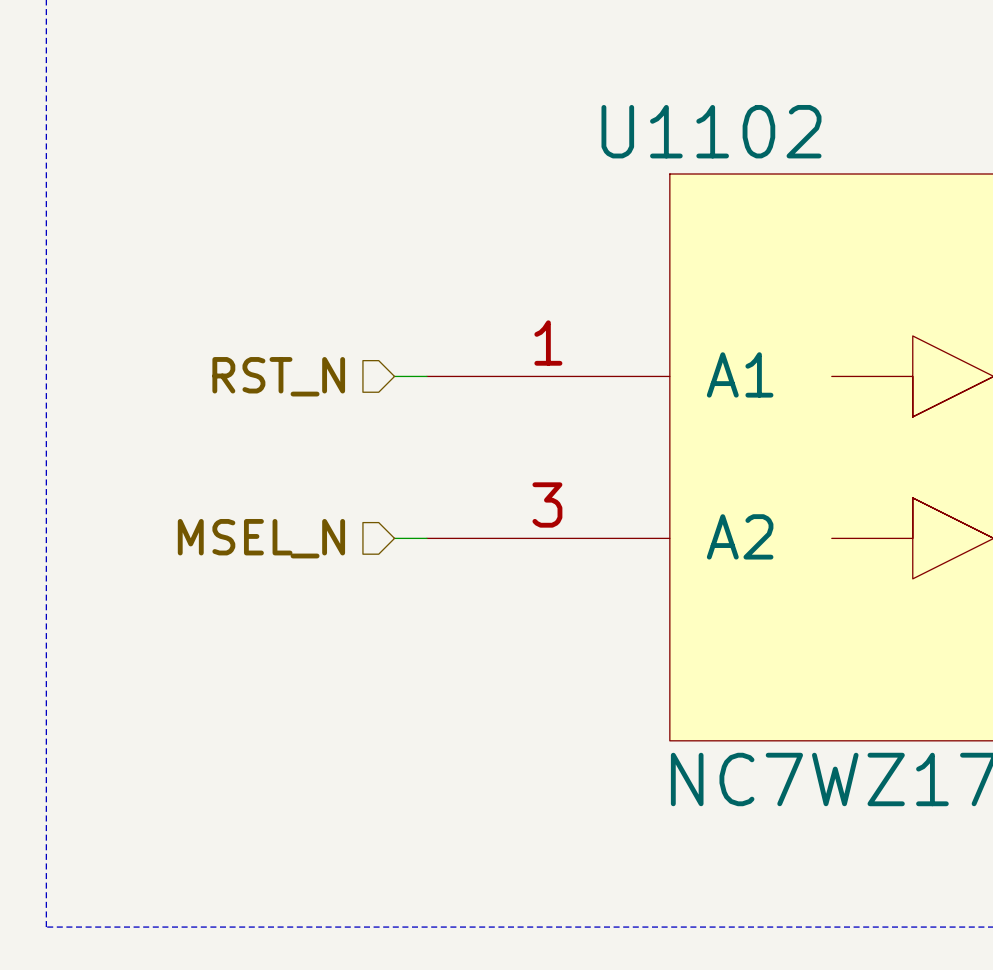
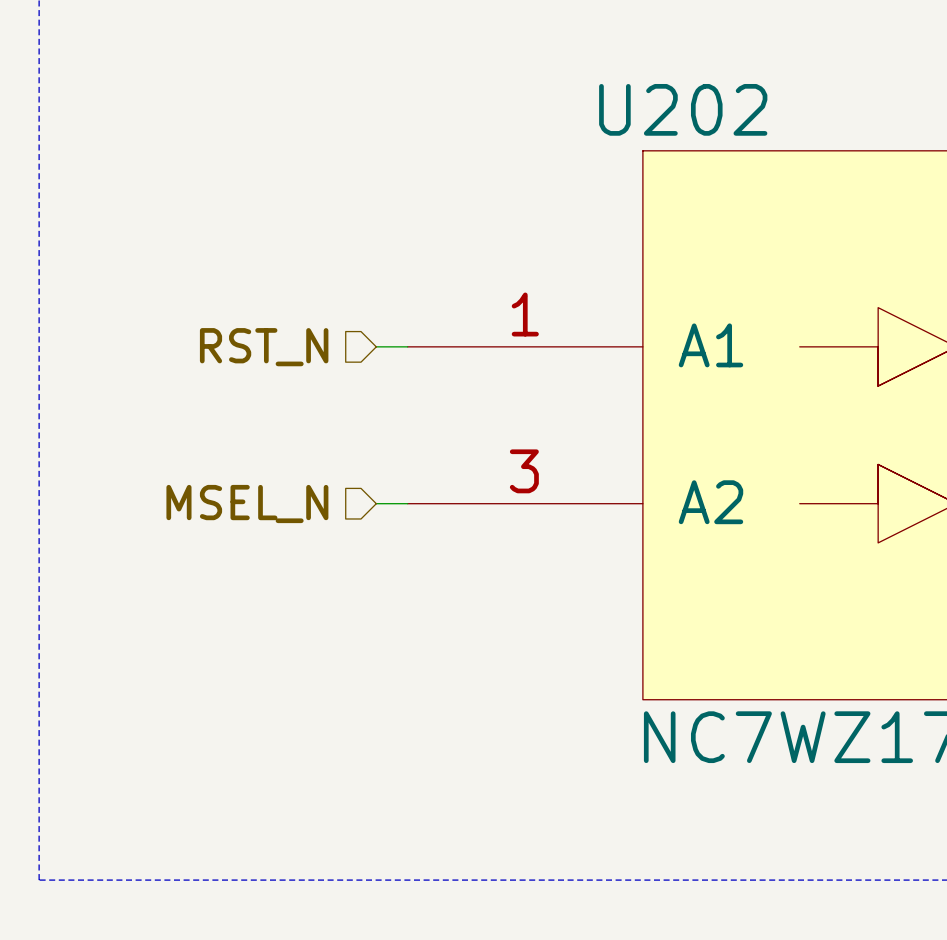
U1102 name: U1102 (711, 131) -> U202 (683, 109)

